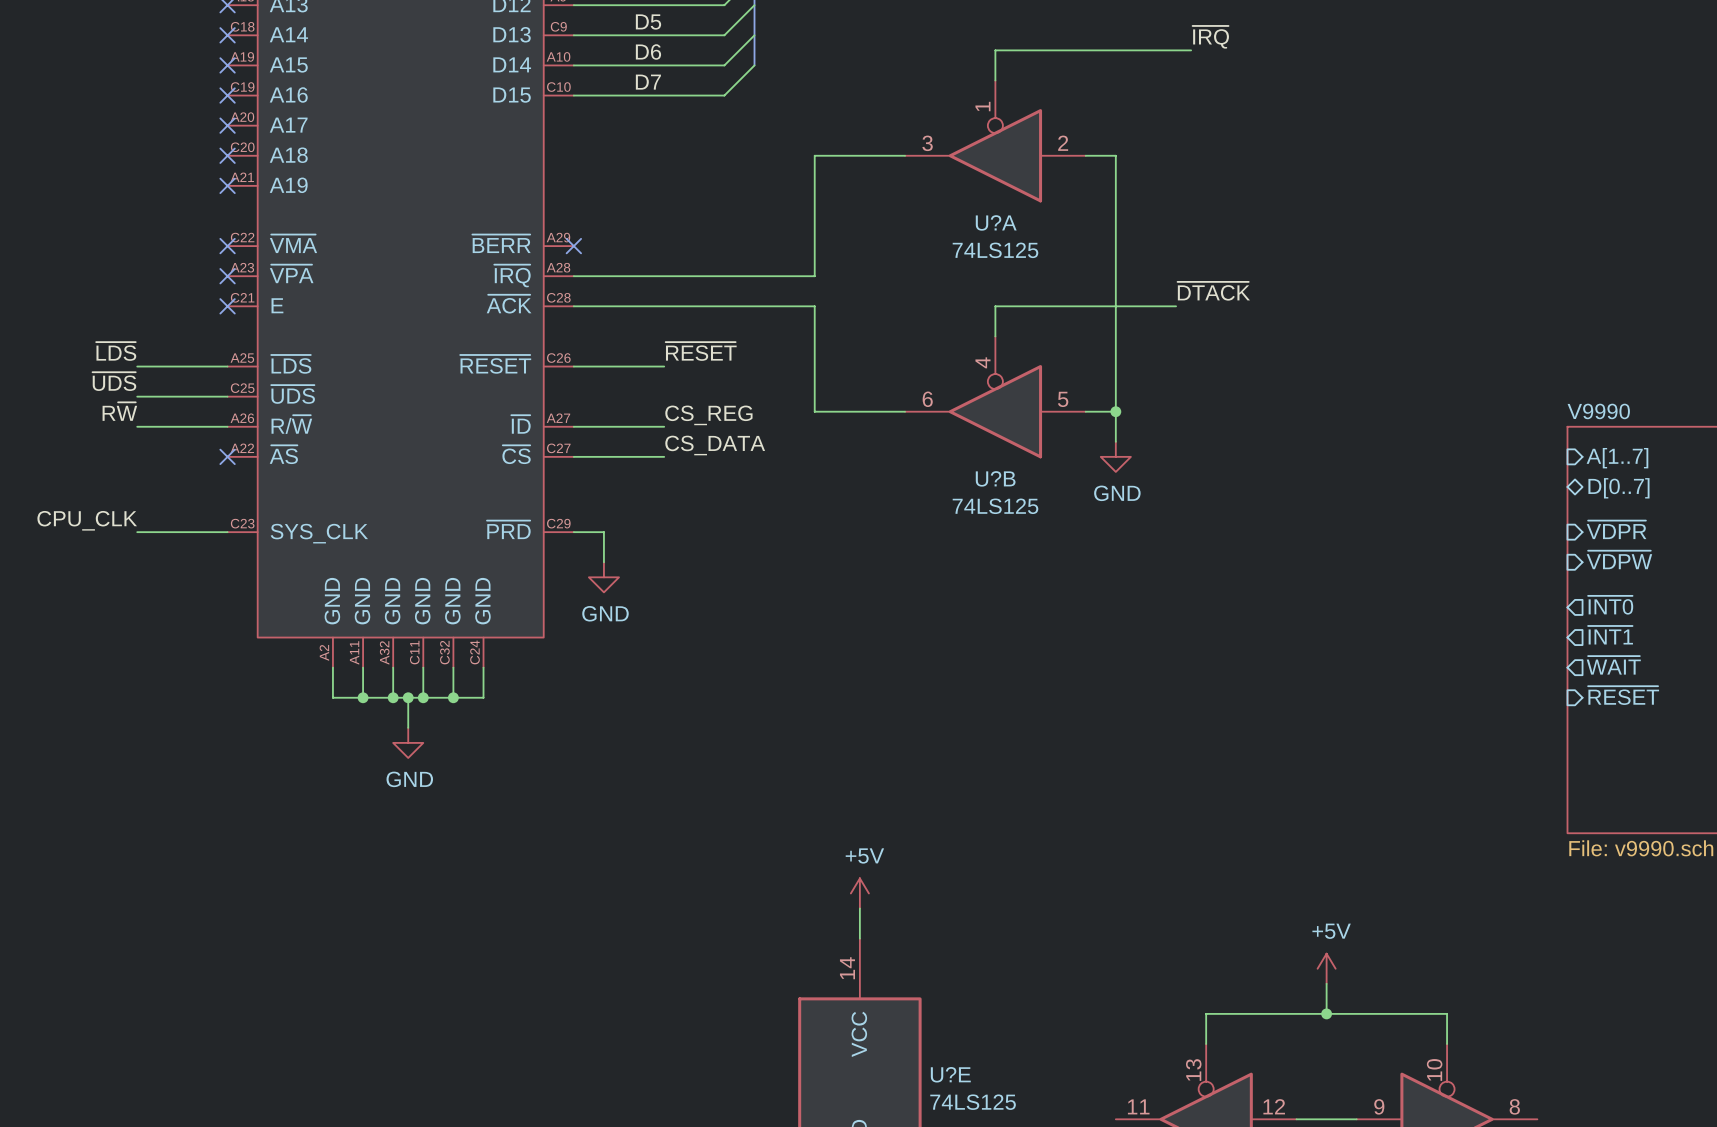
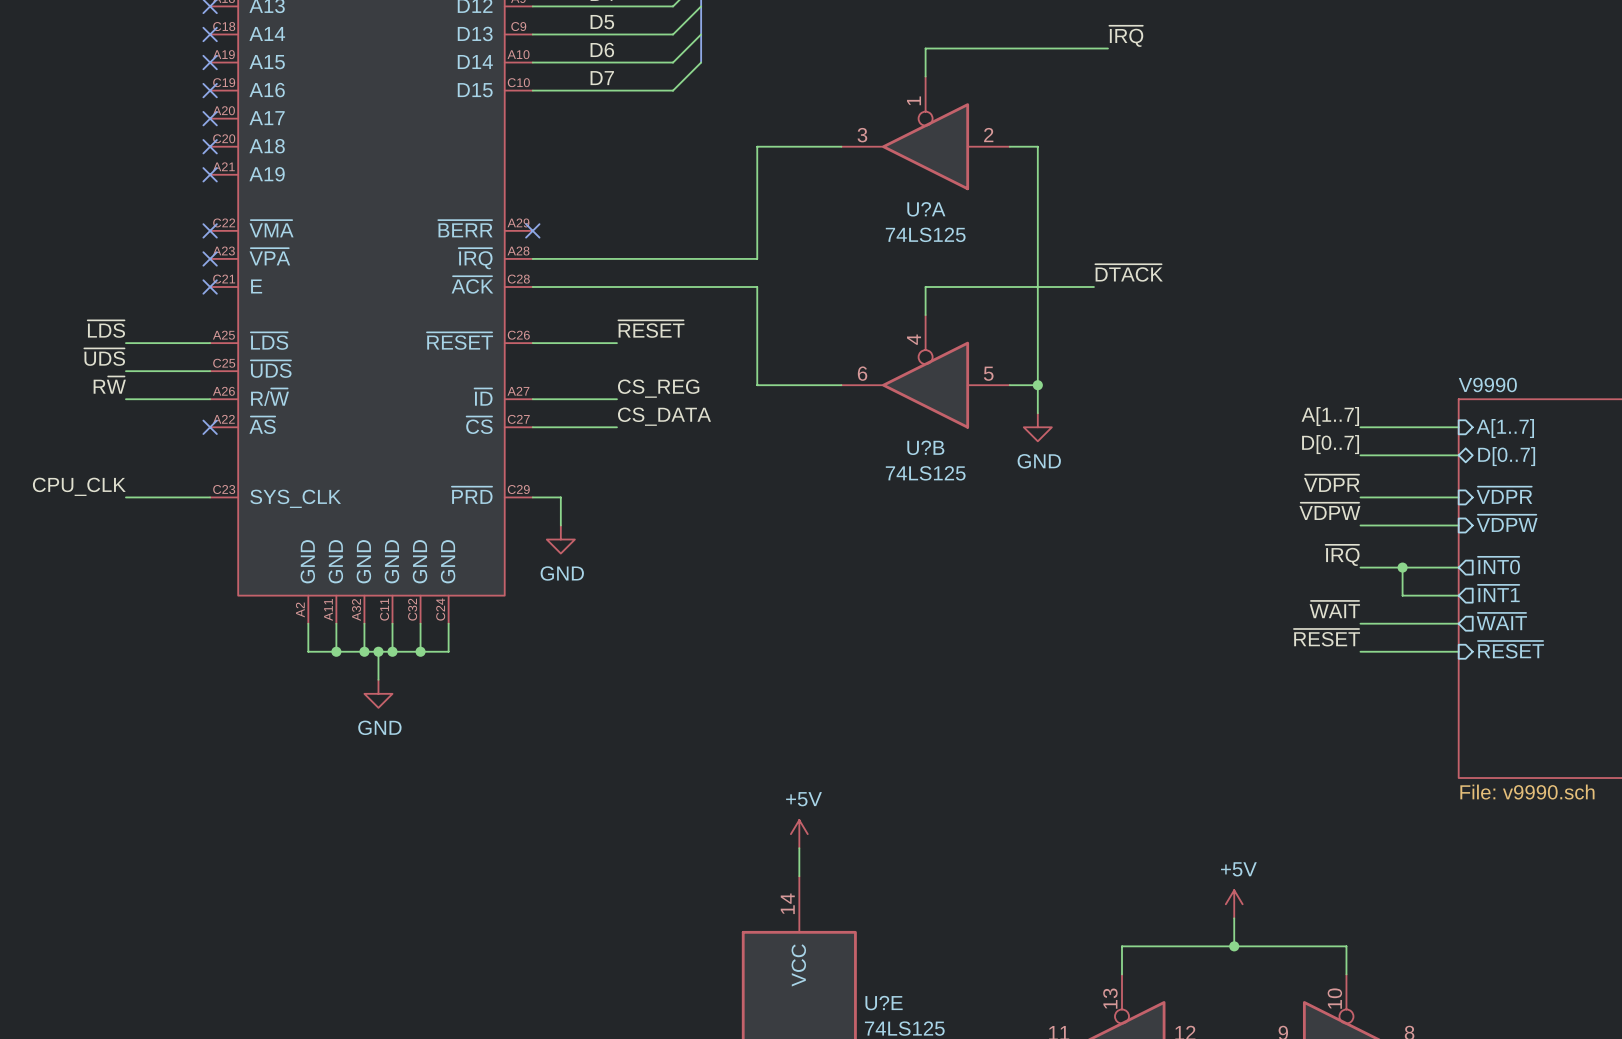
label: none -> A[1..7] (1330, 416)
wire: none -> (1360, 427) (1458, 427)
label: none -> D[0..7] (1330, 444)
wire: none -> (1360, 455) (1458, 455)
label: none -> ~{VDPR} (1331, 483)
wire: none -> (1360, 497) (1458, 497)
label: none -> ~{VDPW} (1329, 511)
wire: none -> (1360, 525) (1458, 525)
label: none -> ~{IRQ} (1342, 555)
wire: none -> (1360, 567) (1458, 567)
wire: none -> (1402, 567) (1402, 595) (1458, 595)
junction: none -> (1402, 567)
label: none -> ~{WAIT} (1334, 609)
wire: none -> (1360, 623) (1458, 623)
label: none -> ~{RESET} (1326, 637)
wire: none -> (1360, 651) (1458, 651)

